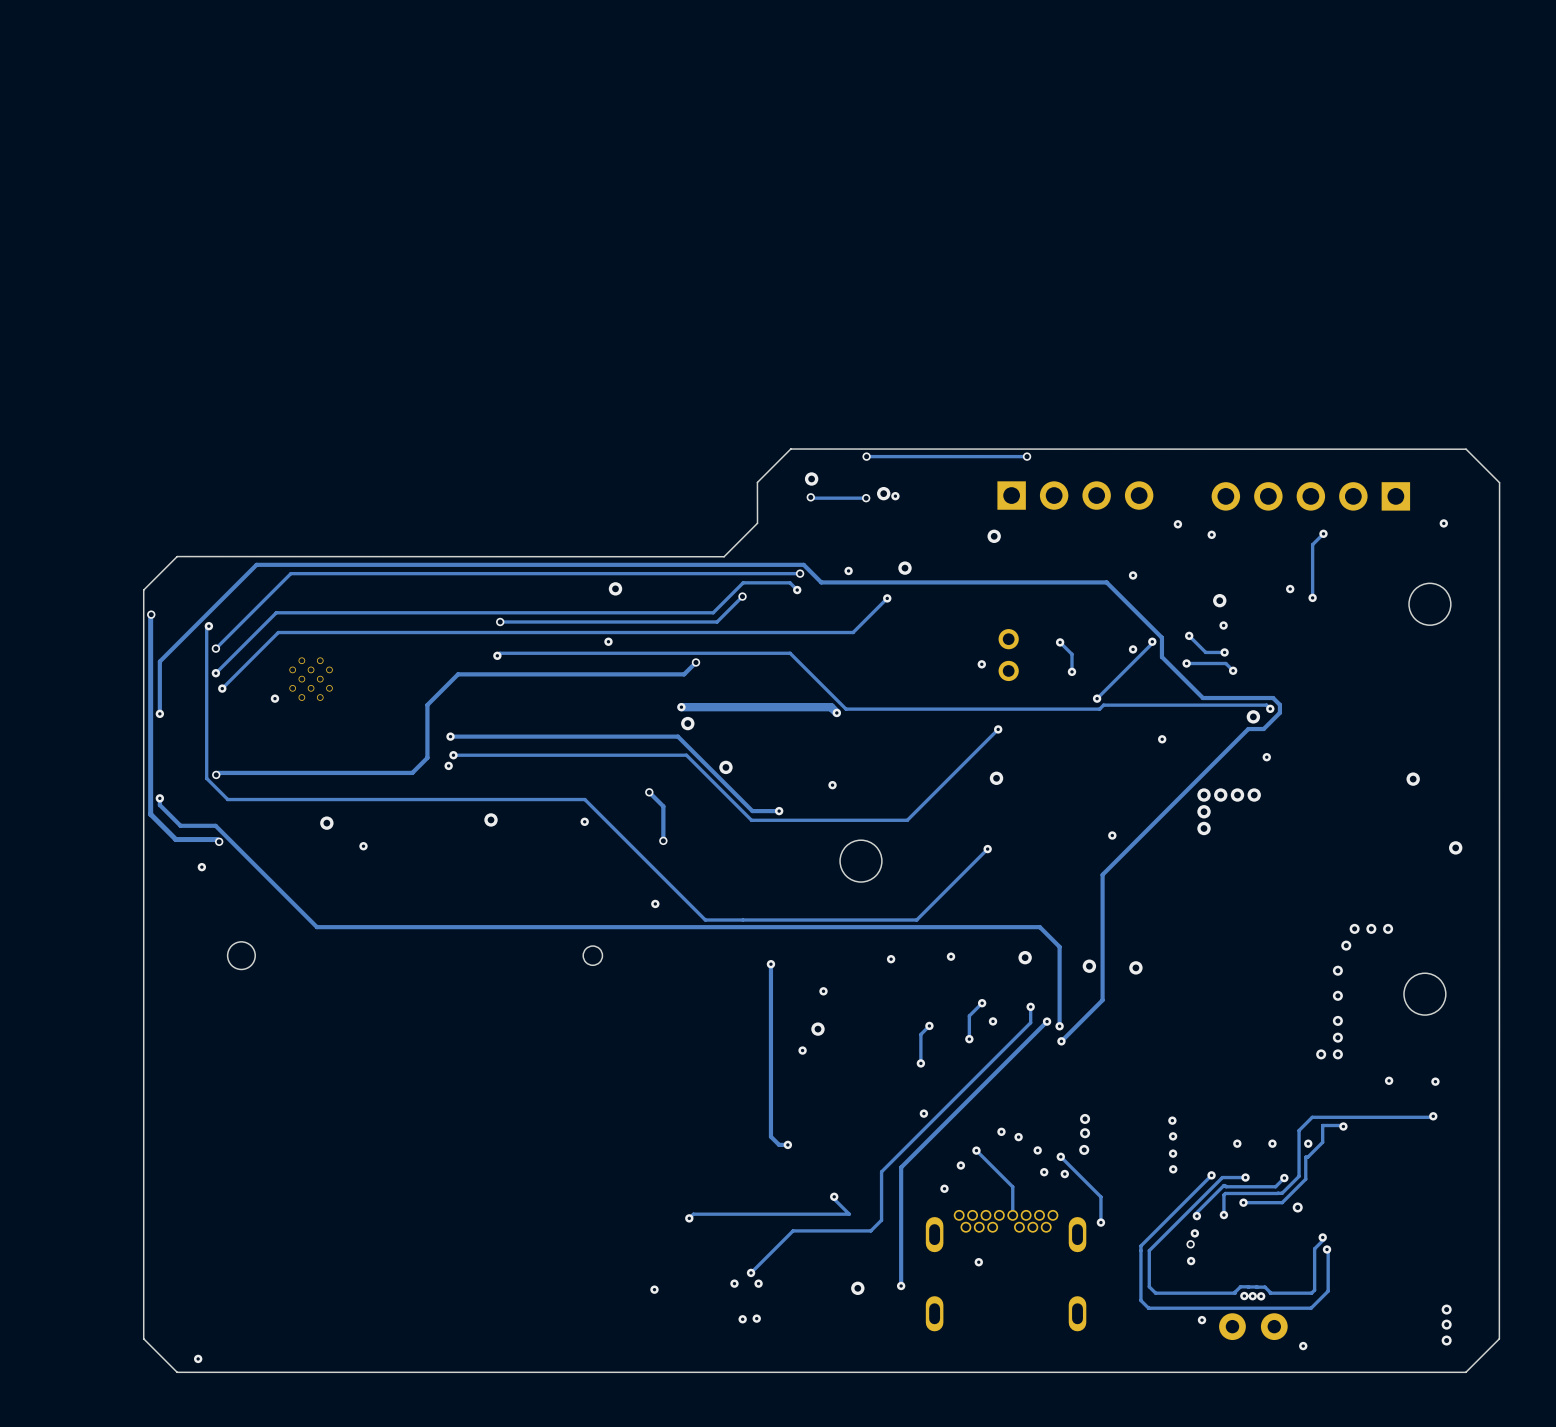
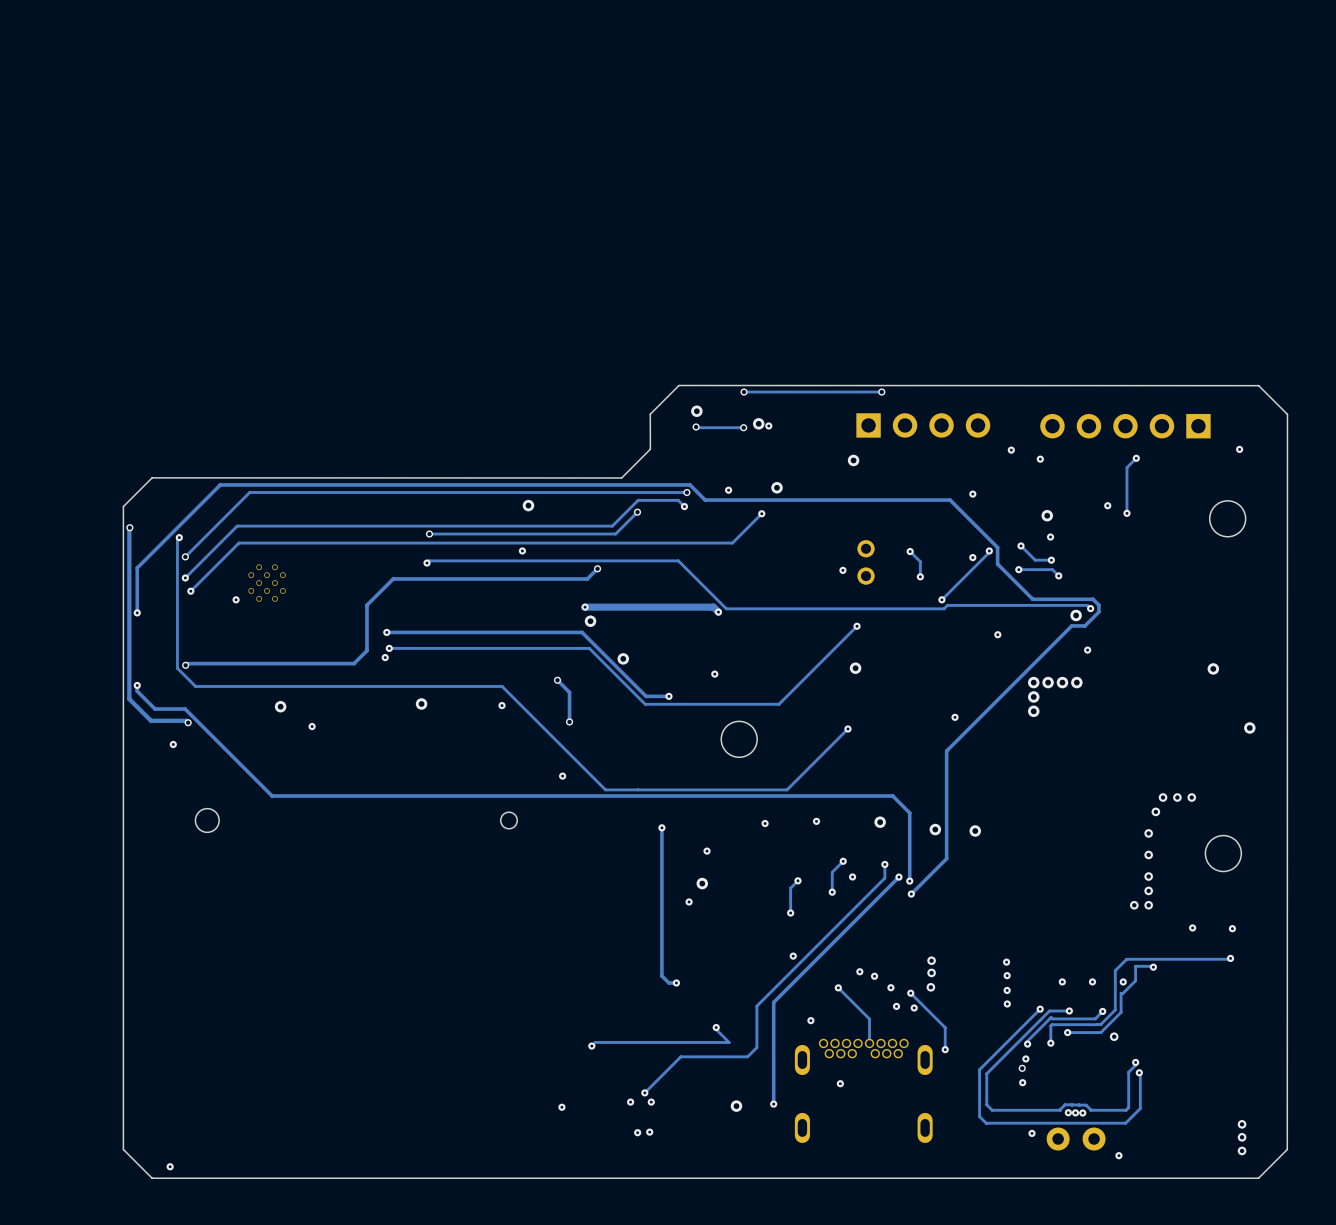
via: (960, 1165) -> none

